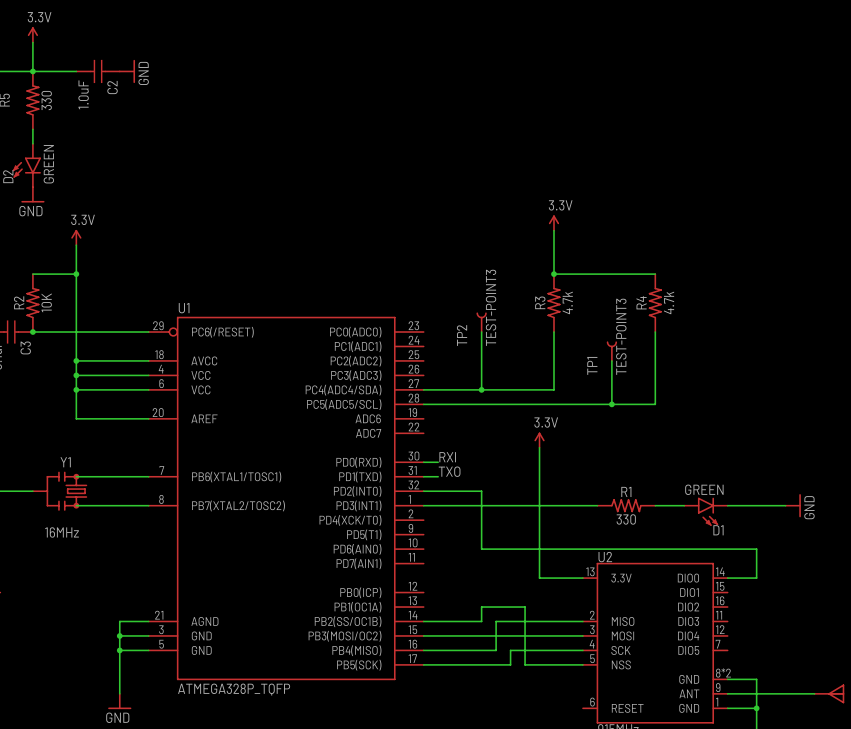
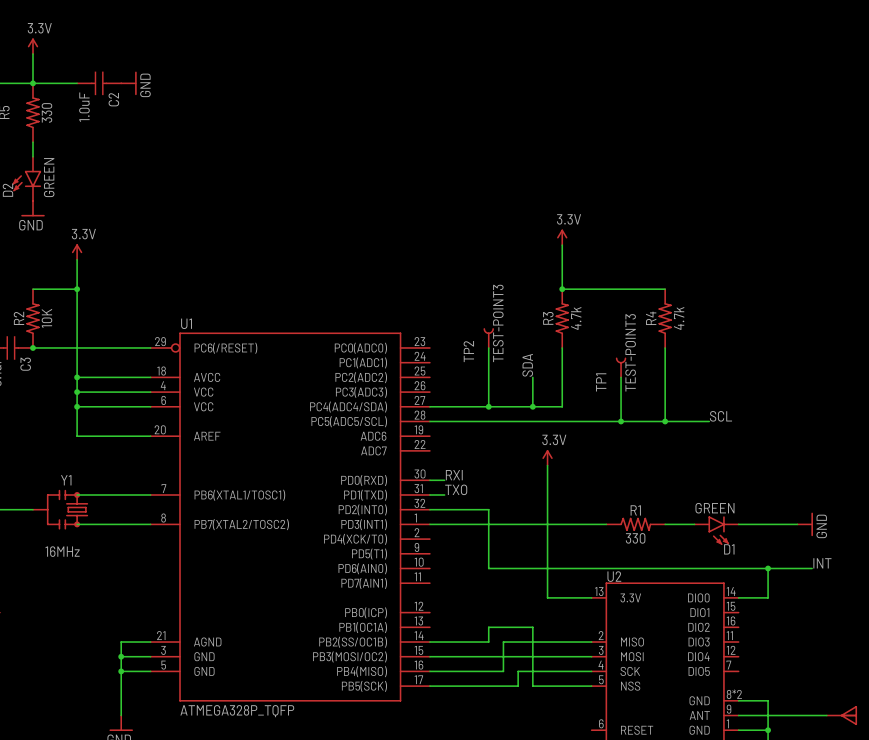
label: none -> SDA (527, 365)
wire: none -> (532, 377) (532, 406)
junction: none -> (532, 406)
label: none -> SCL (721, 416)
wire: none -> (665, 421) (709, 421)
junction: none -> (665, 421)
label: none -> INT (822, 563)
wire: none -> (768, 568) (812, 568)
junction: none -> (768, 568)

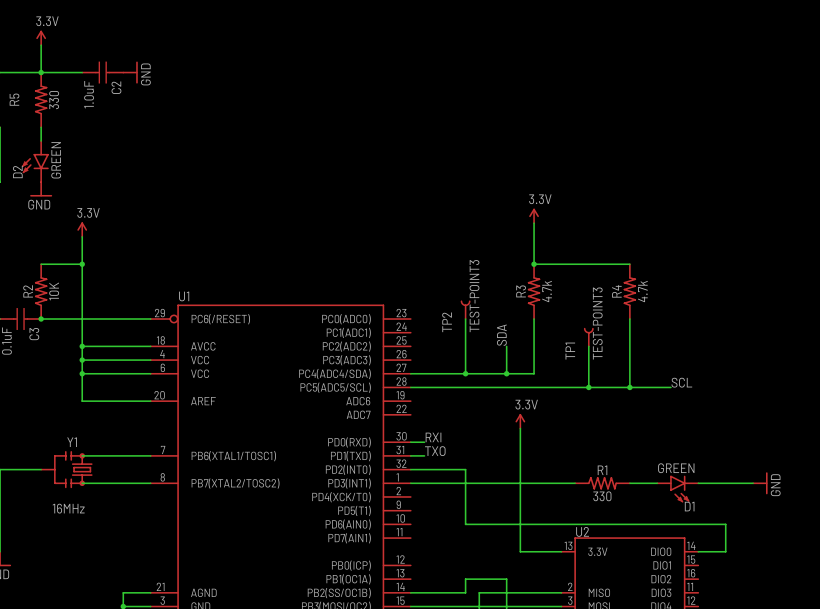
label: INT (822, 563) -> none
wire: (768, 568) (812, 568) -> none
junction: (768, 568) -> none

